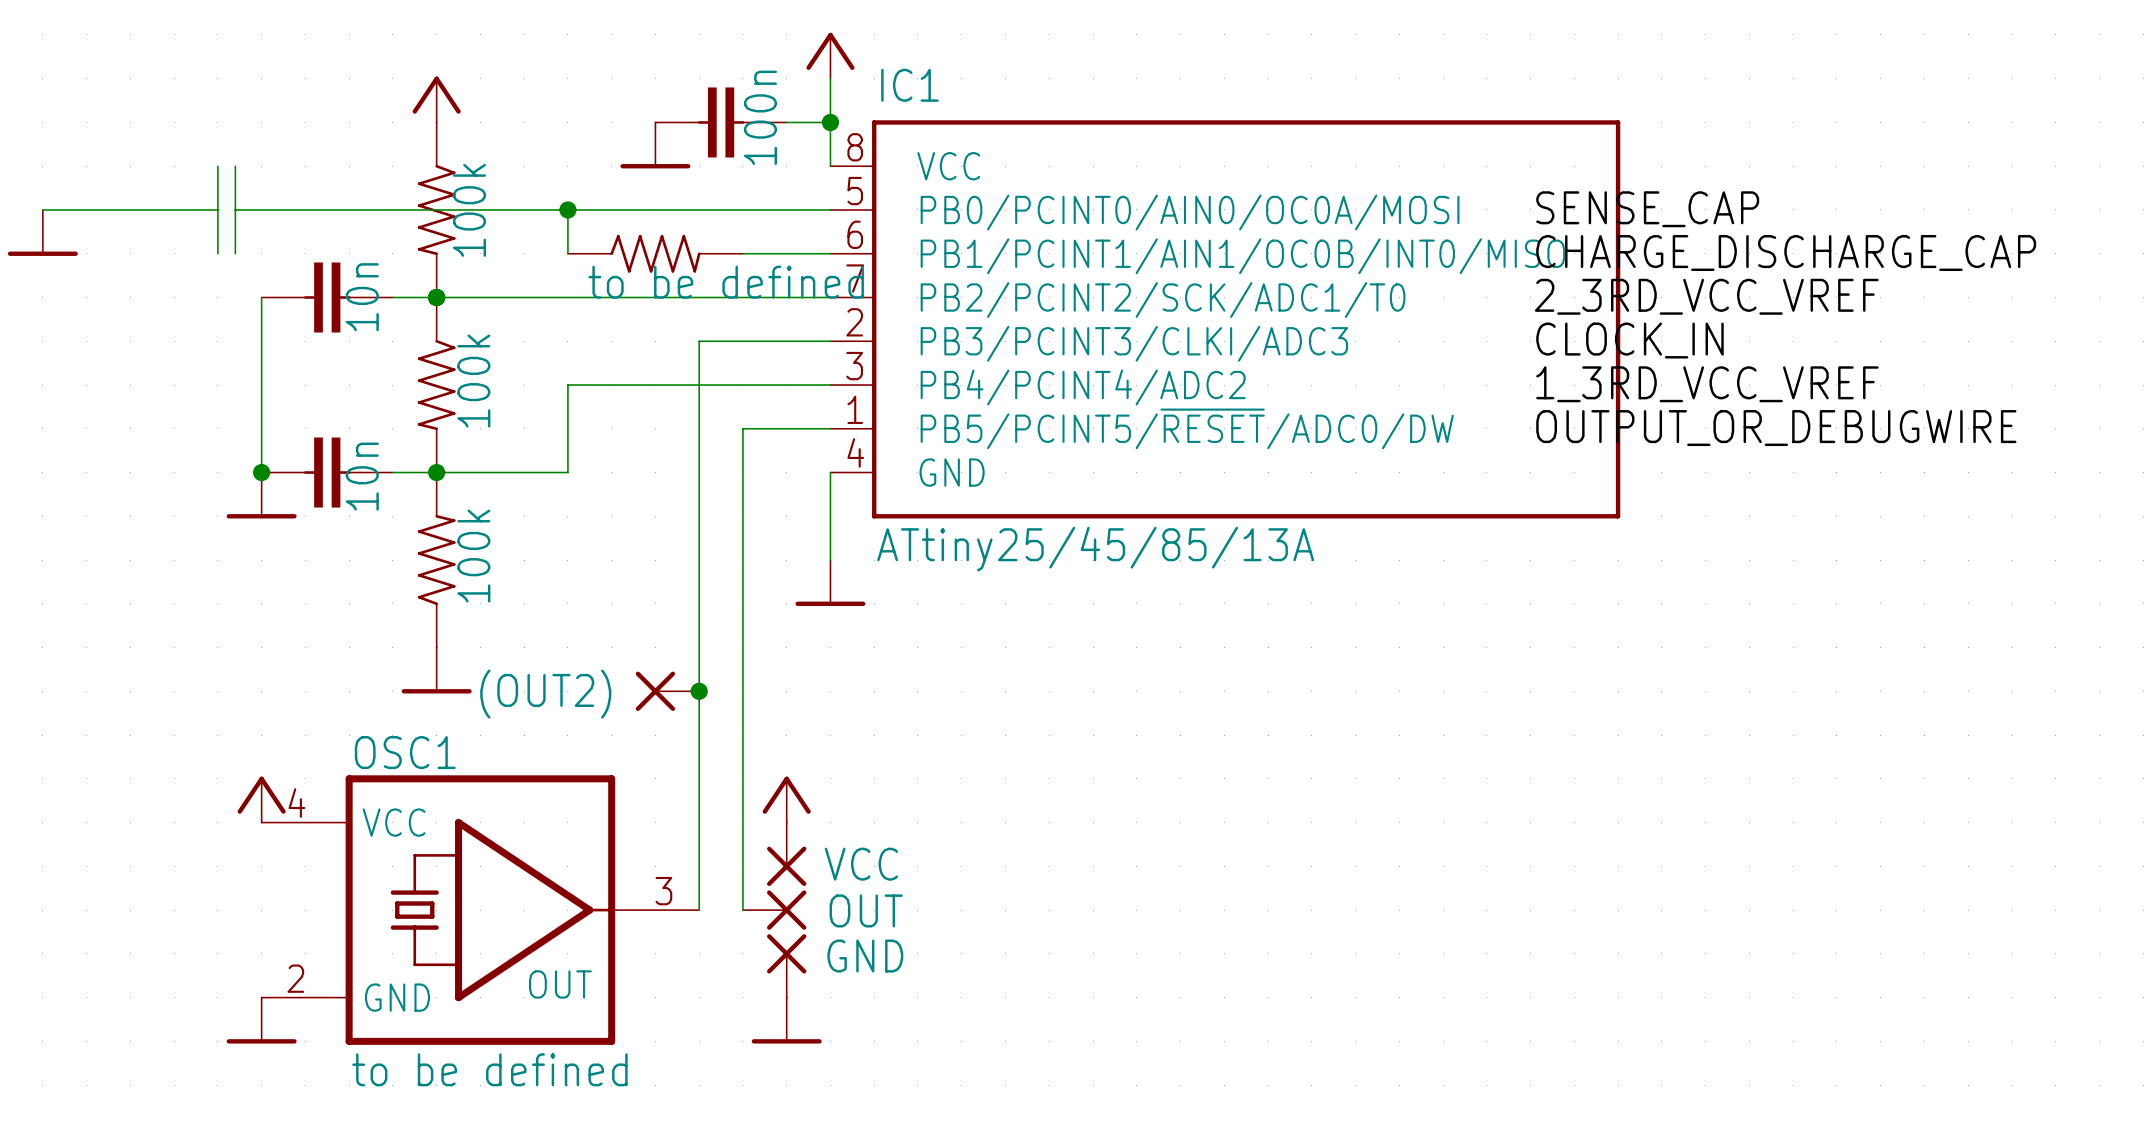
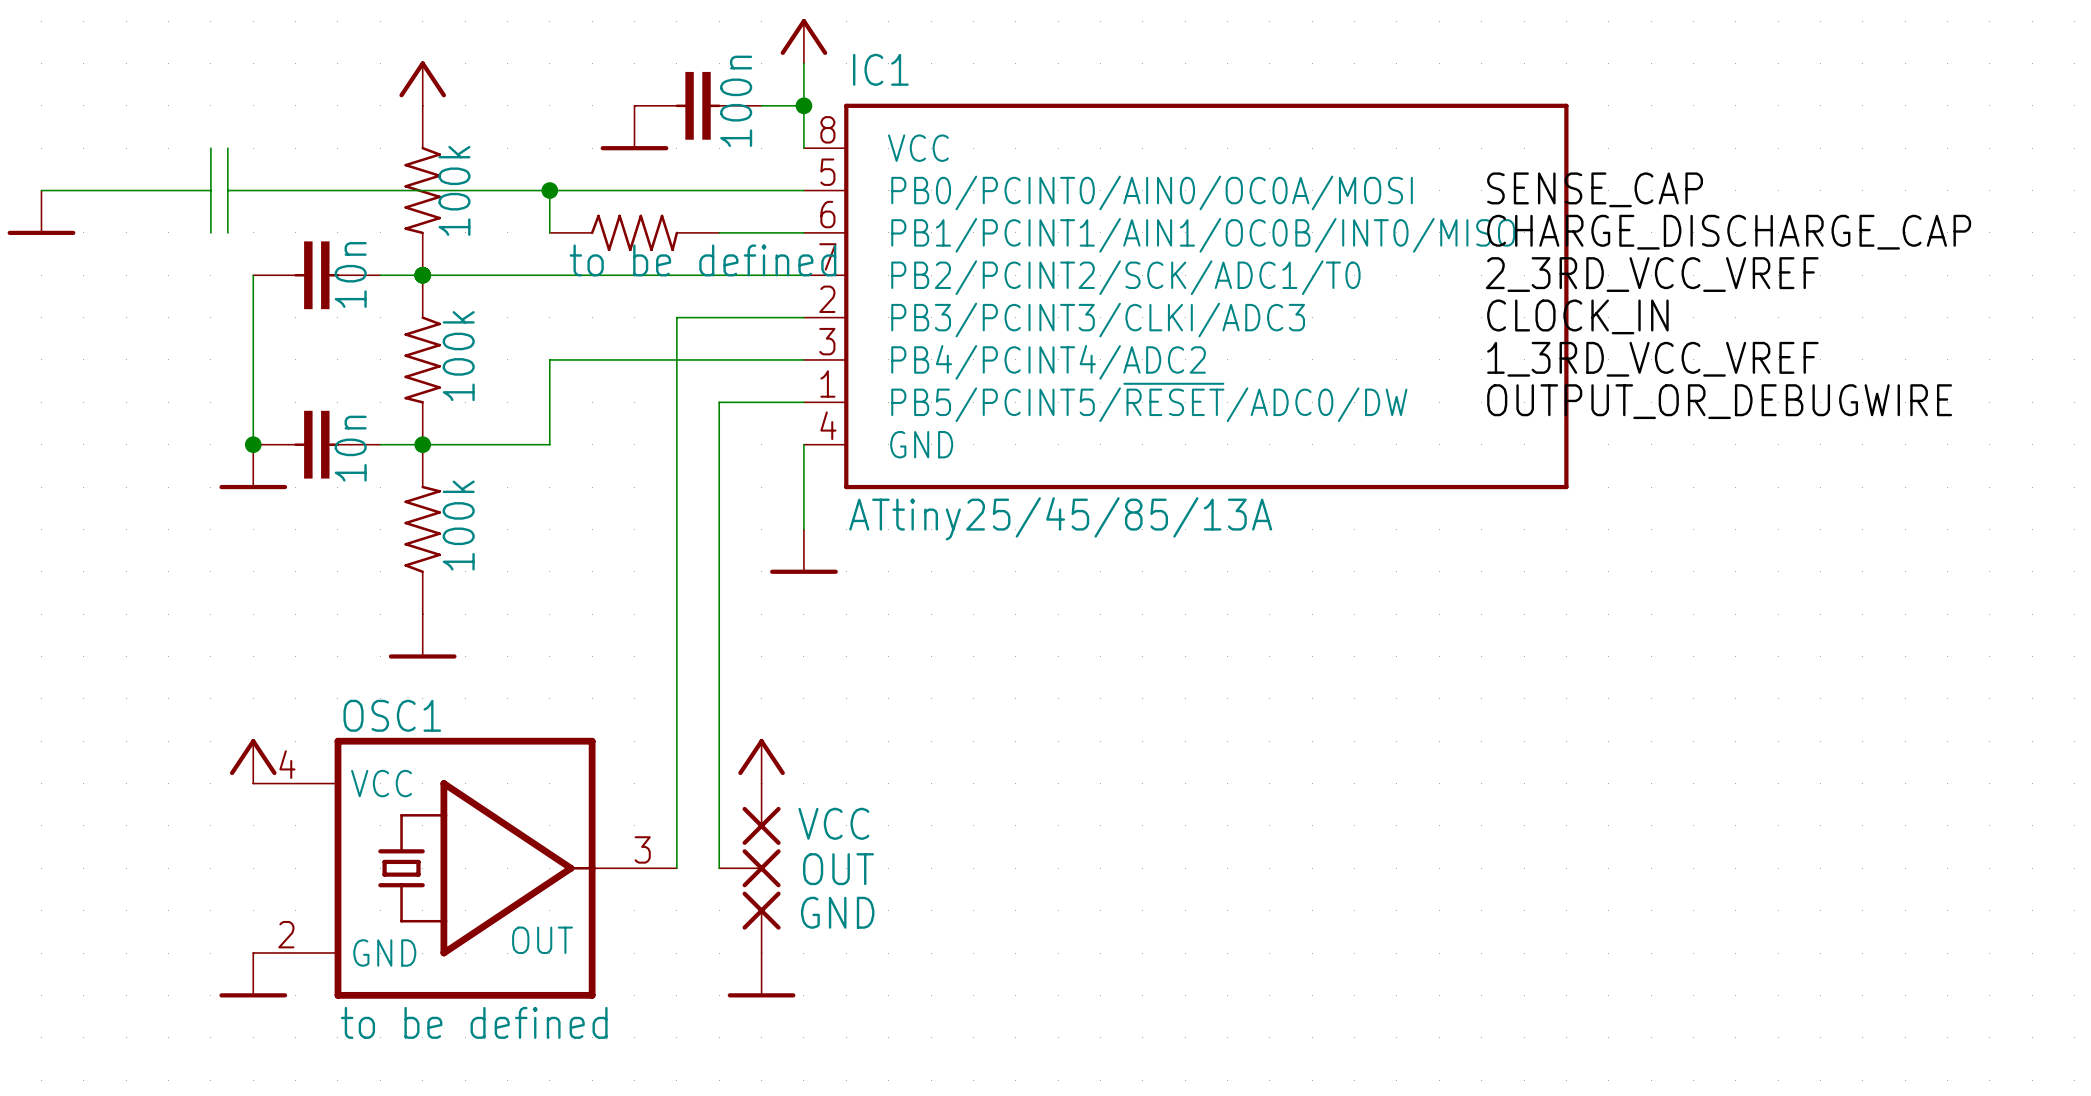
(OUT2): (667, 691) -> none
junction: (699, 691) -> none

